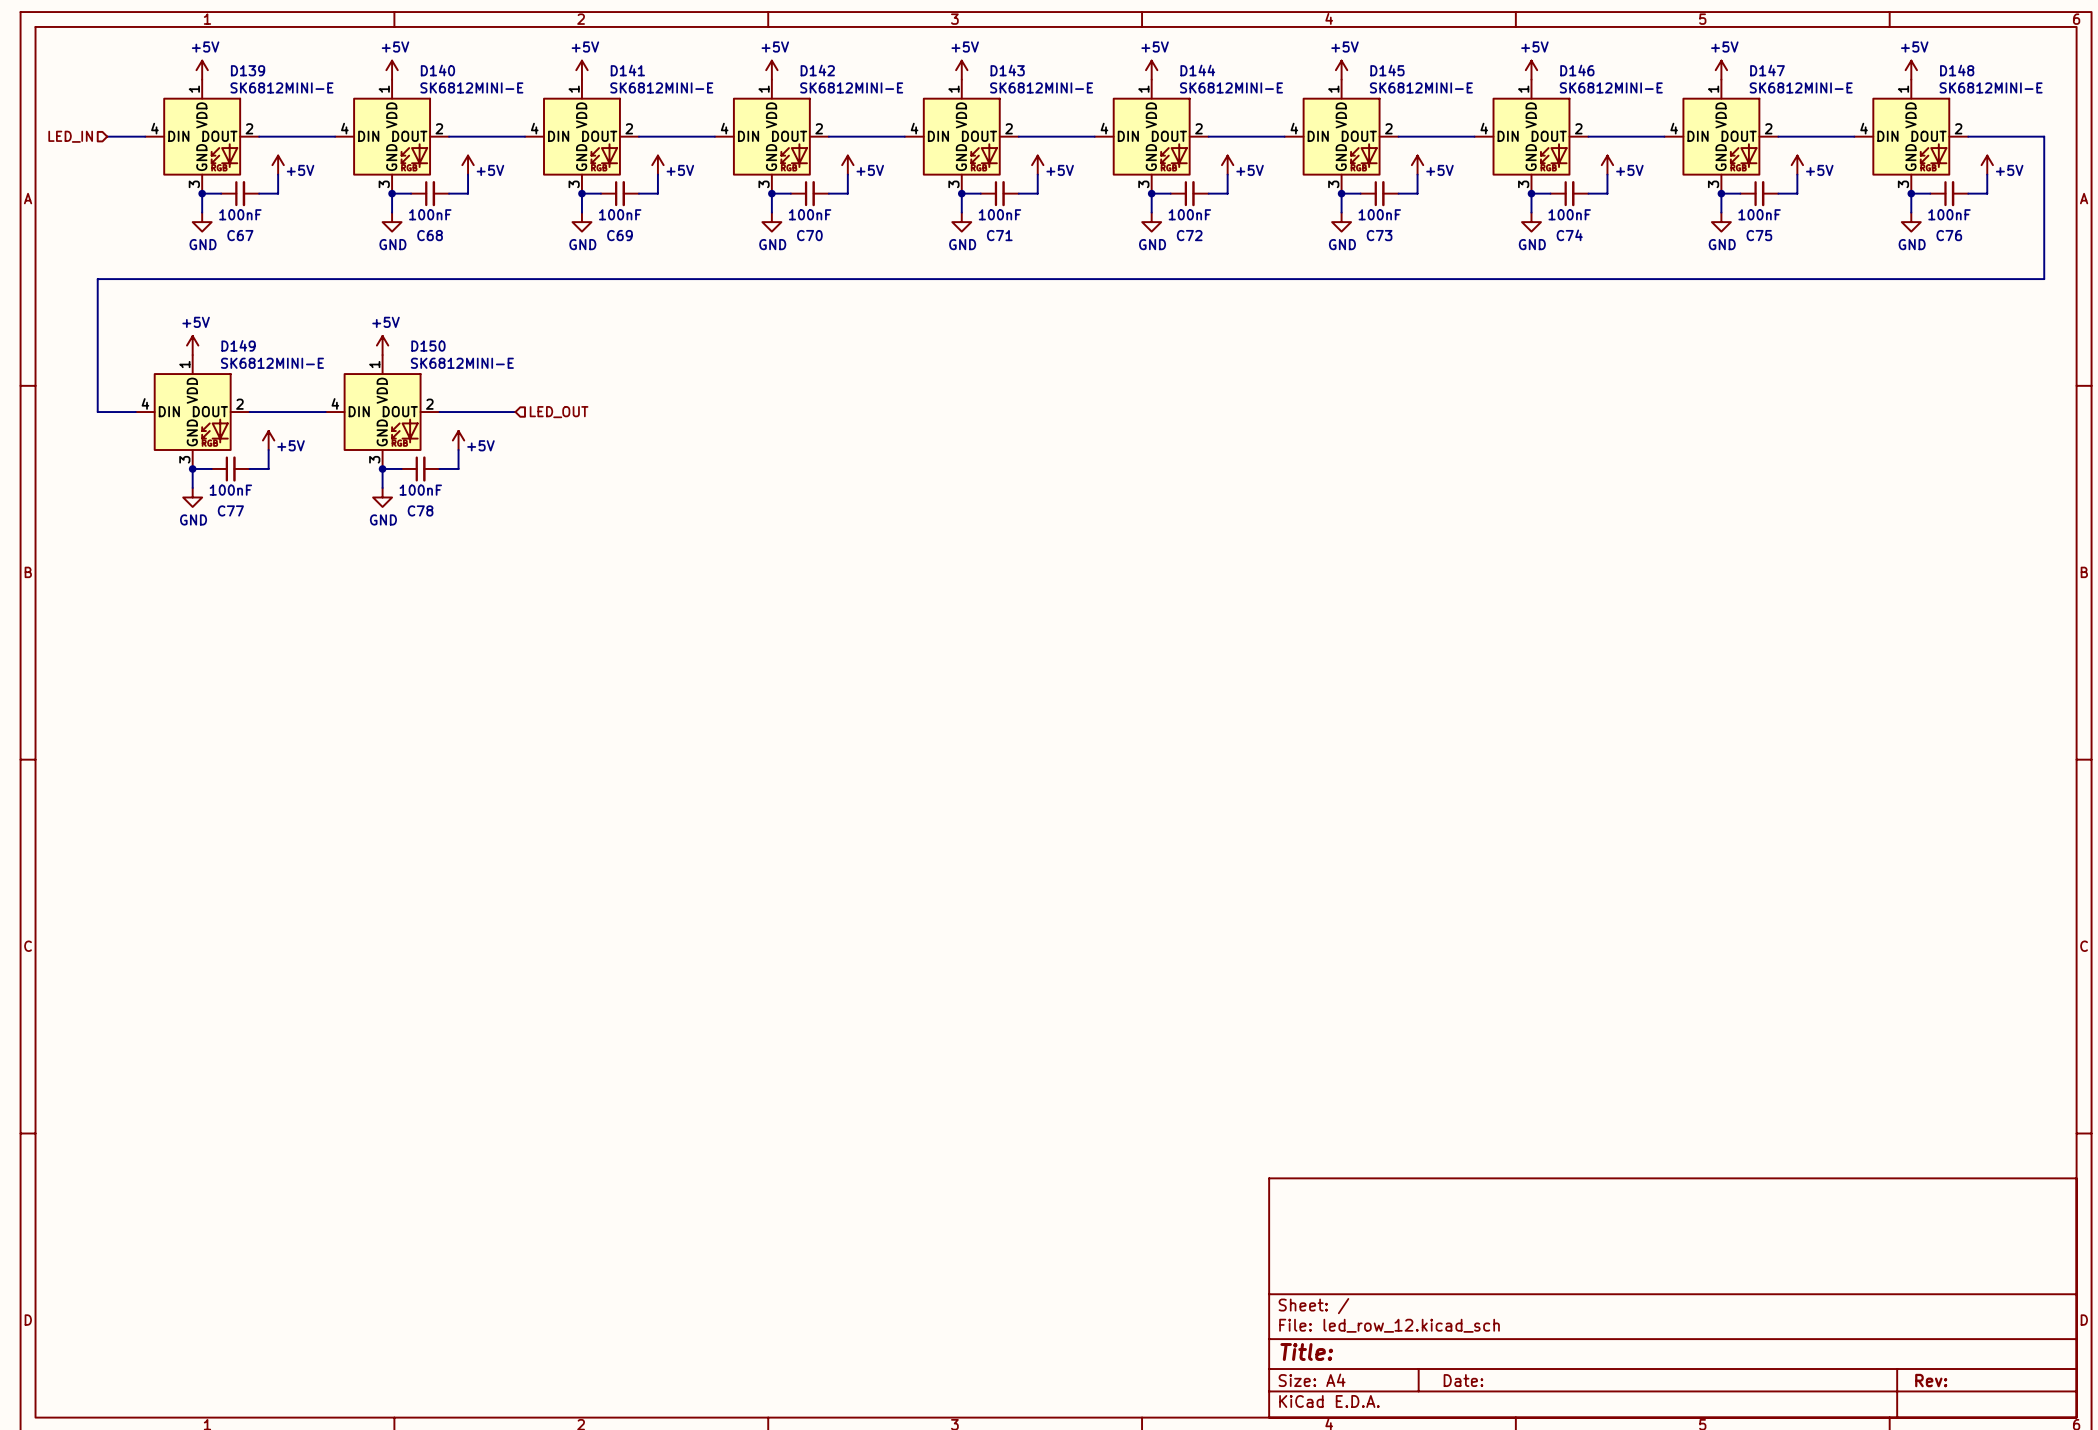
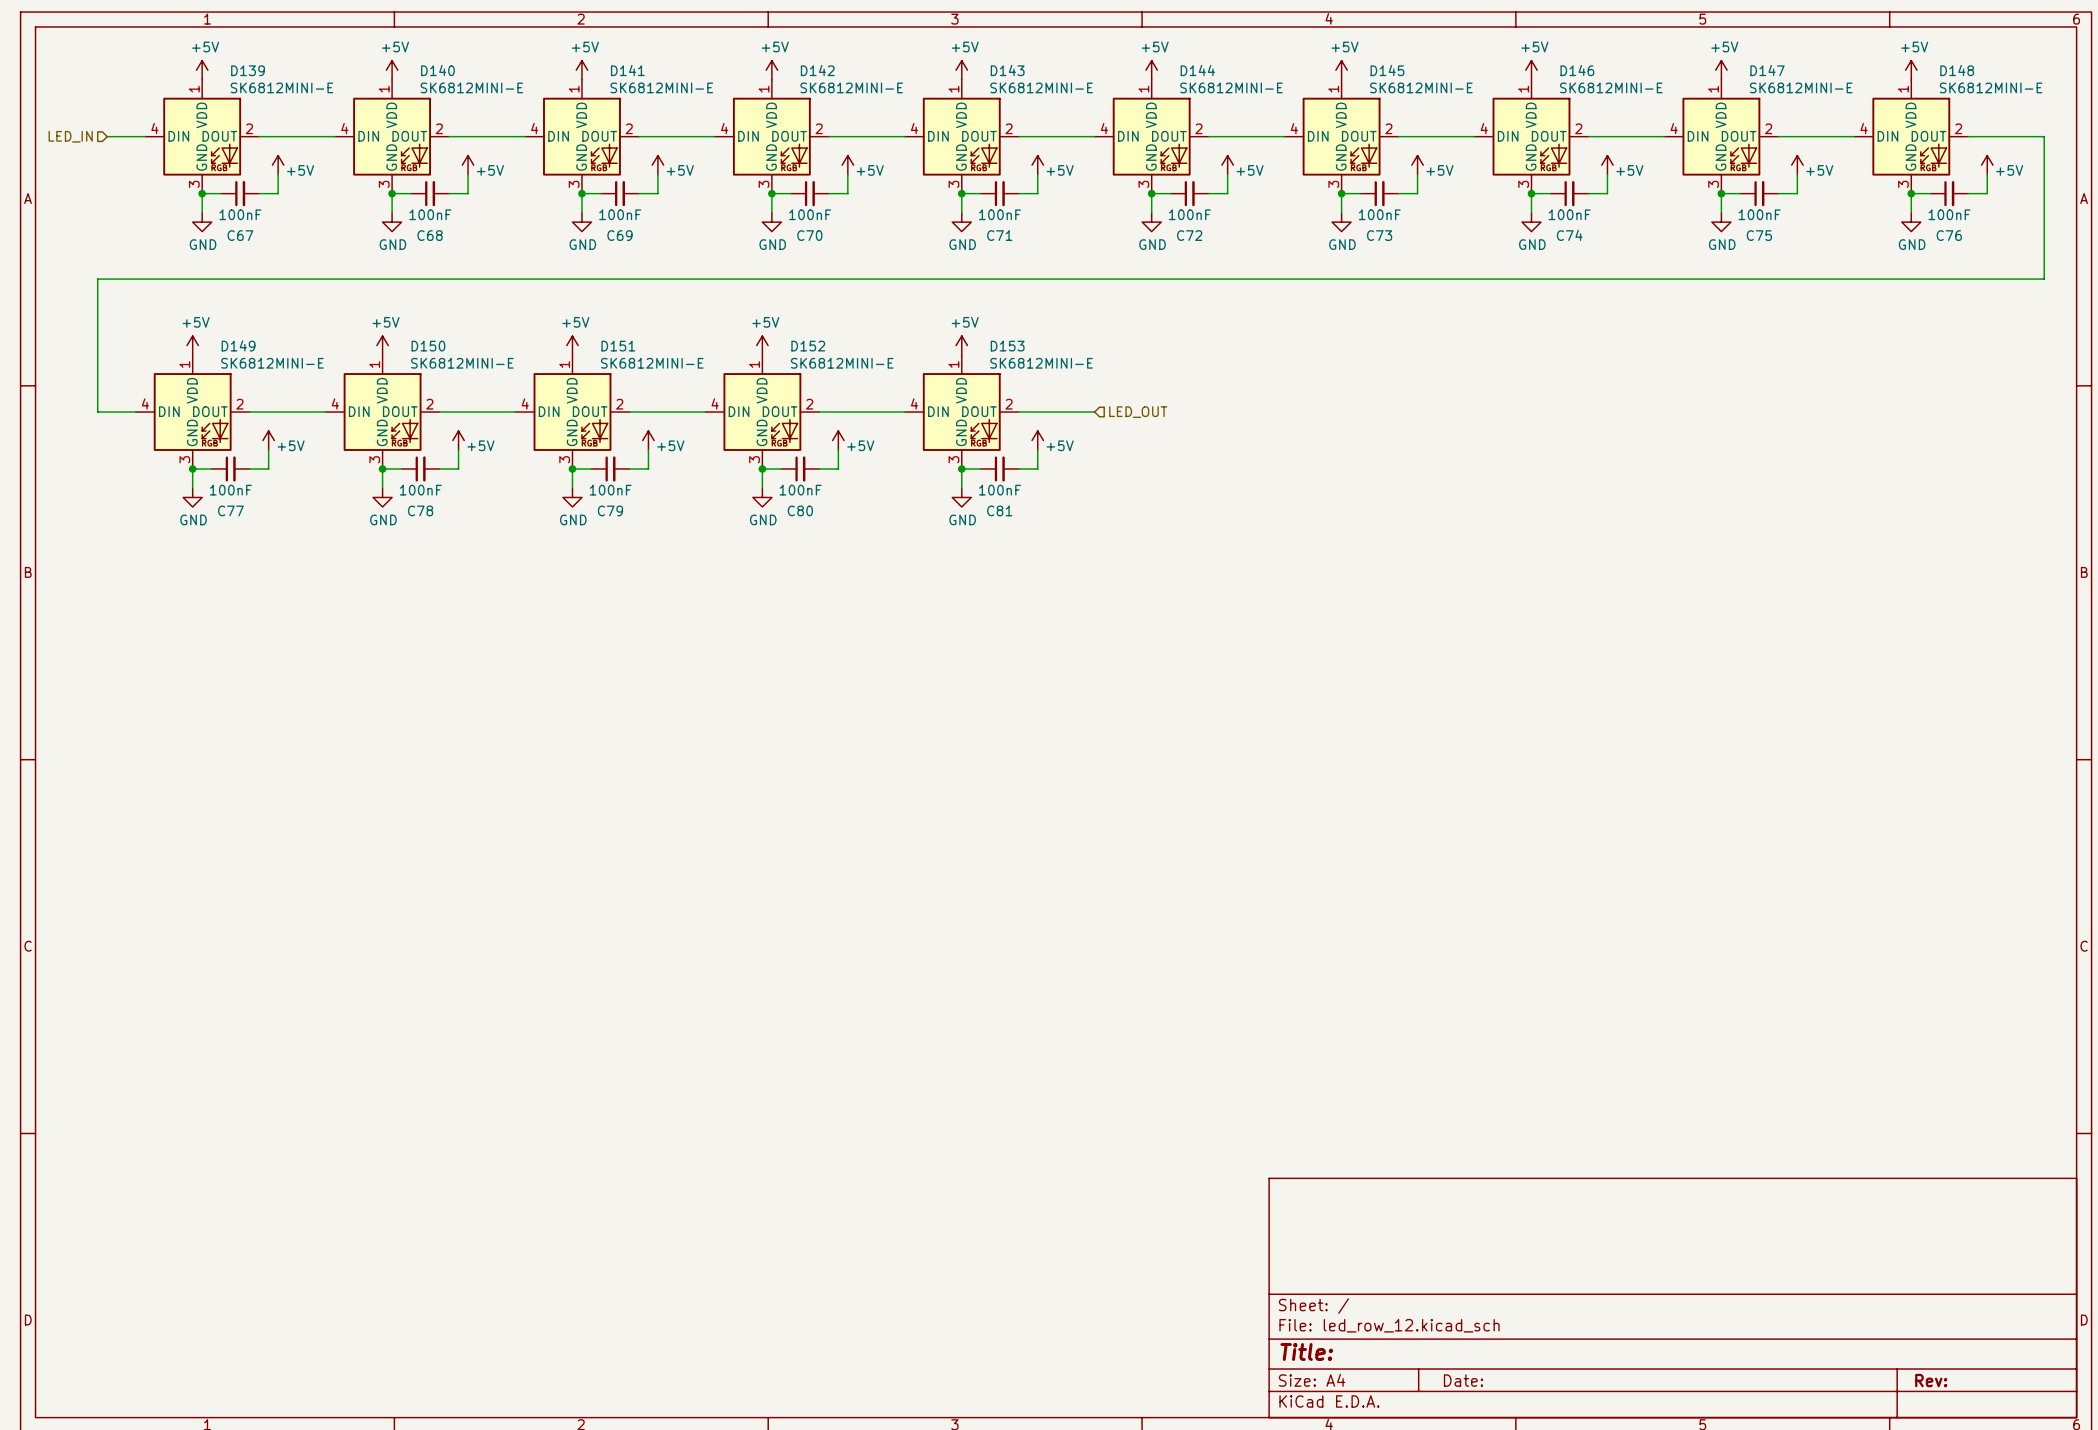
power symbol: none -> +5V (572, 345)
power symbol: none -> +5V (762, 345)
power symbol: none -> +5V (961, 345)
hierarchical label: LED_OUT (559, 412) -> none
D151: none -> SK6812MINI-E (572, 412)
wire: none -> (629, 412) (705, 412)
D152: none -> SK6812MINI-E (762, 412)
wire: none -> (819, 412) (904, 412)
D153: none -> SK6812MINI-E (961, 412)
wire: none -> (1018, 412) (1094, 412)
hierarchical label: none -> LED_OUT (1138, 412)
power symbol: none -> +5V (648, 440)
power symbol: none -> +5V (838, 440)
power symbol: none -> +5V (1037, 440)
wire: none -> (648, 450) (648, 468) (629, 468)
wire: none -> (838, 450) (838, 468) (819, 468)
wire: none -> (1037, 450) (1037, 468) (1018, 468)
junction: none -> (572, 468)
wire: none -> (591, 468) (572, 468) (572, 487)
C79: none -> 100nF (610, 468)
junction: none -> (762, 468)
wire: none -> (781, 468) (762, 468) (762, 487)
C80: none -> 100nF (800, 468)
junction: none -> (961, 468)
wire: none -> (980, 468) (961, 468) (961, 487)
C81: none -> 100nF (999, 468)
power symbol: none -> GND (572, 497)
power symbol: none -> GND (762, 497)
power symbol: none -> GND (961, 497)

